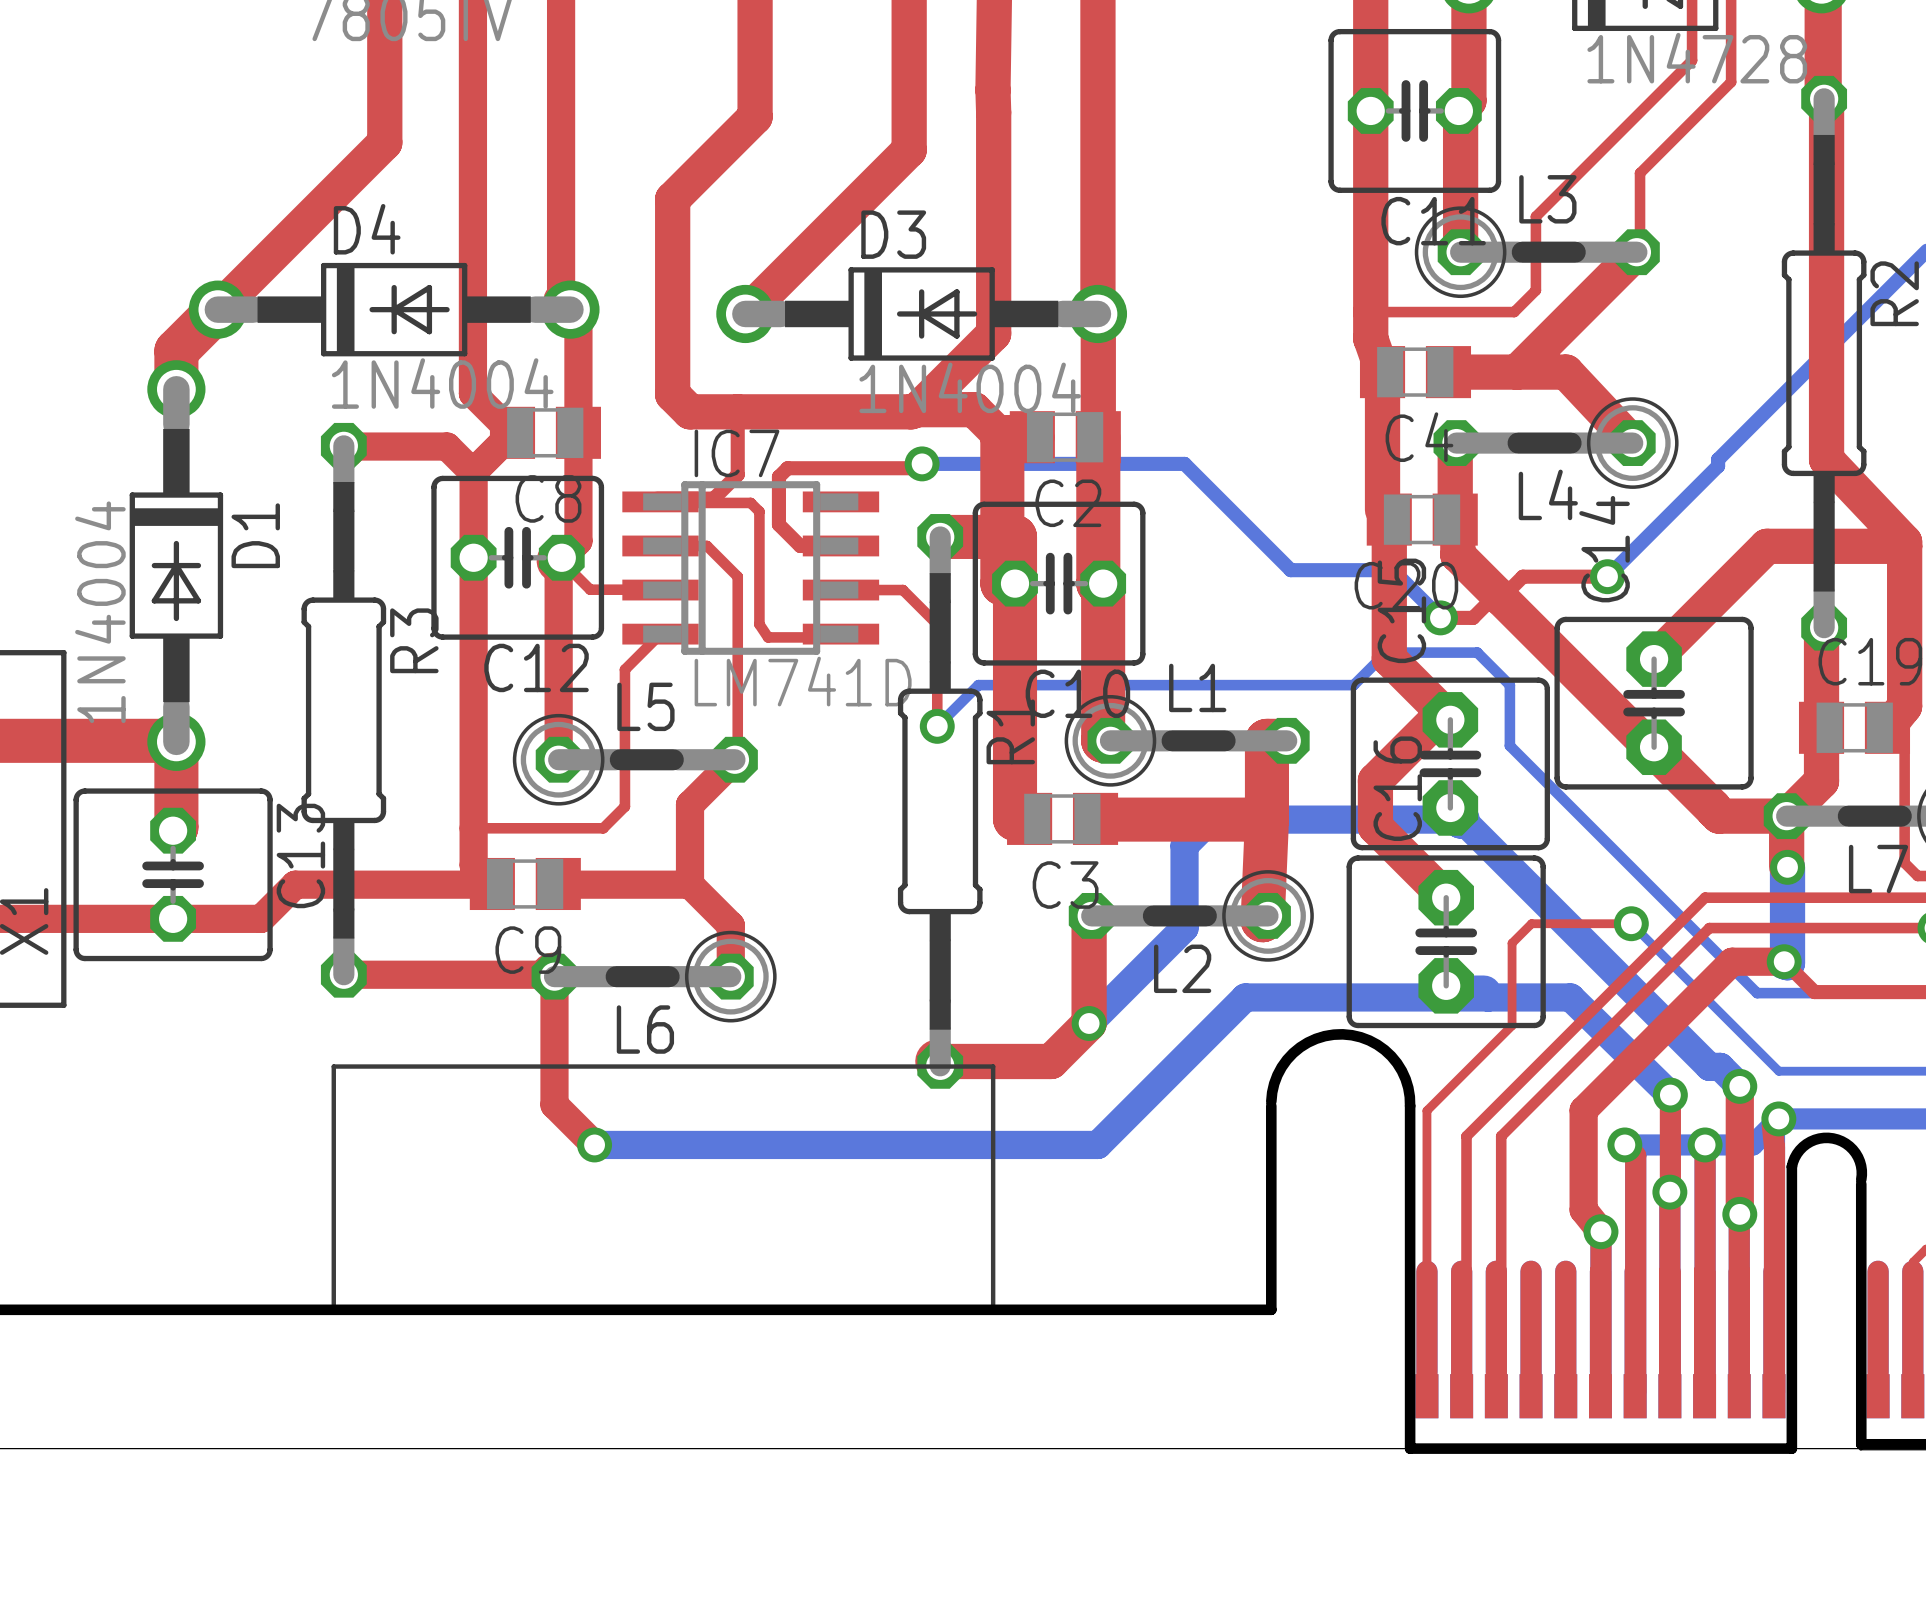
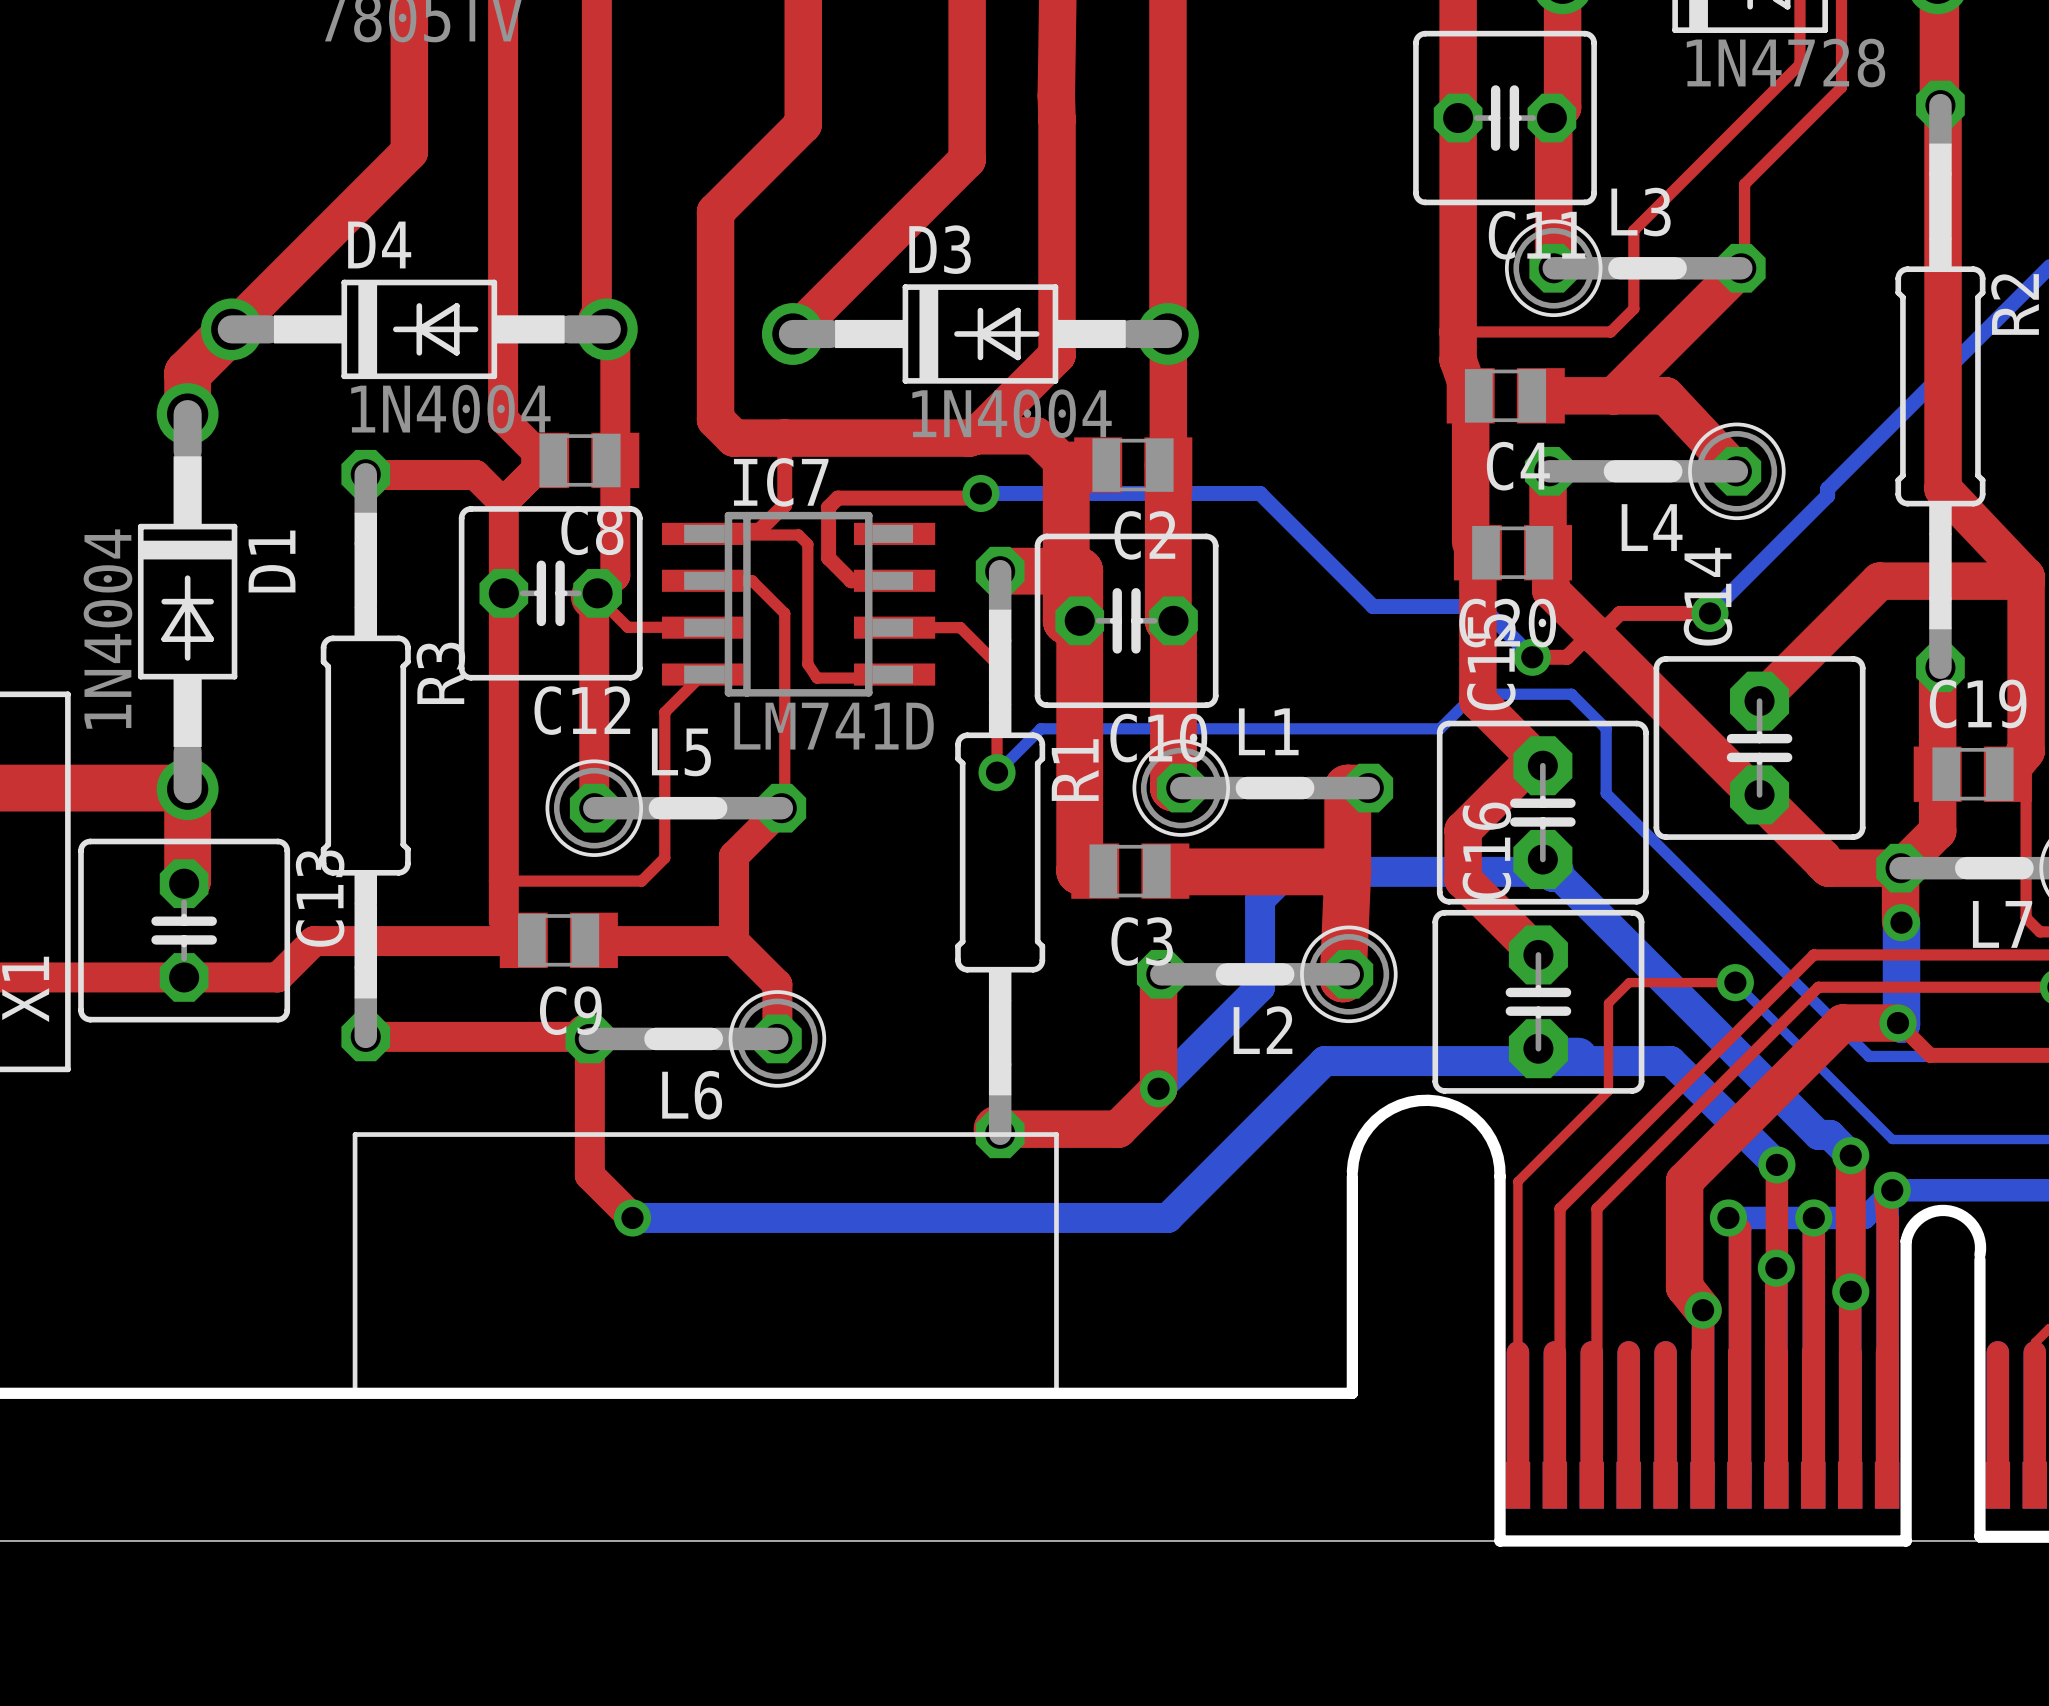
top track width: thin (1784, 961) (1732, 961) (1583, 1110) (1583, 1210) (1600, 1231) -> thick (1897, 1023) (1842, 1023) (1684, 1181) (1684, 1287) (1703, 1310)

